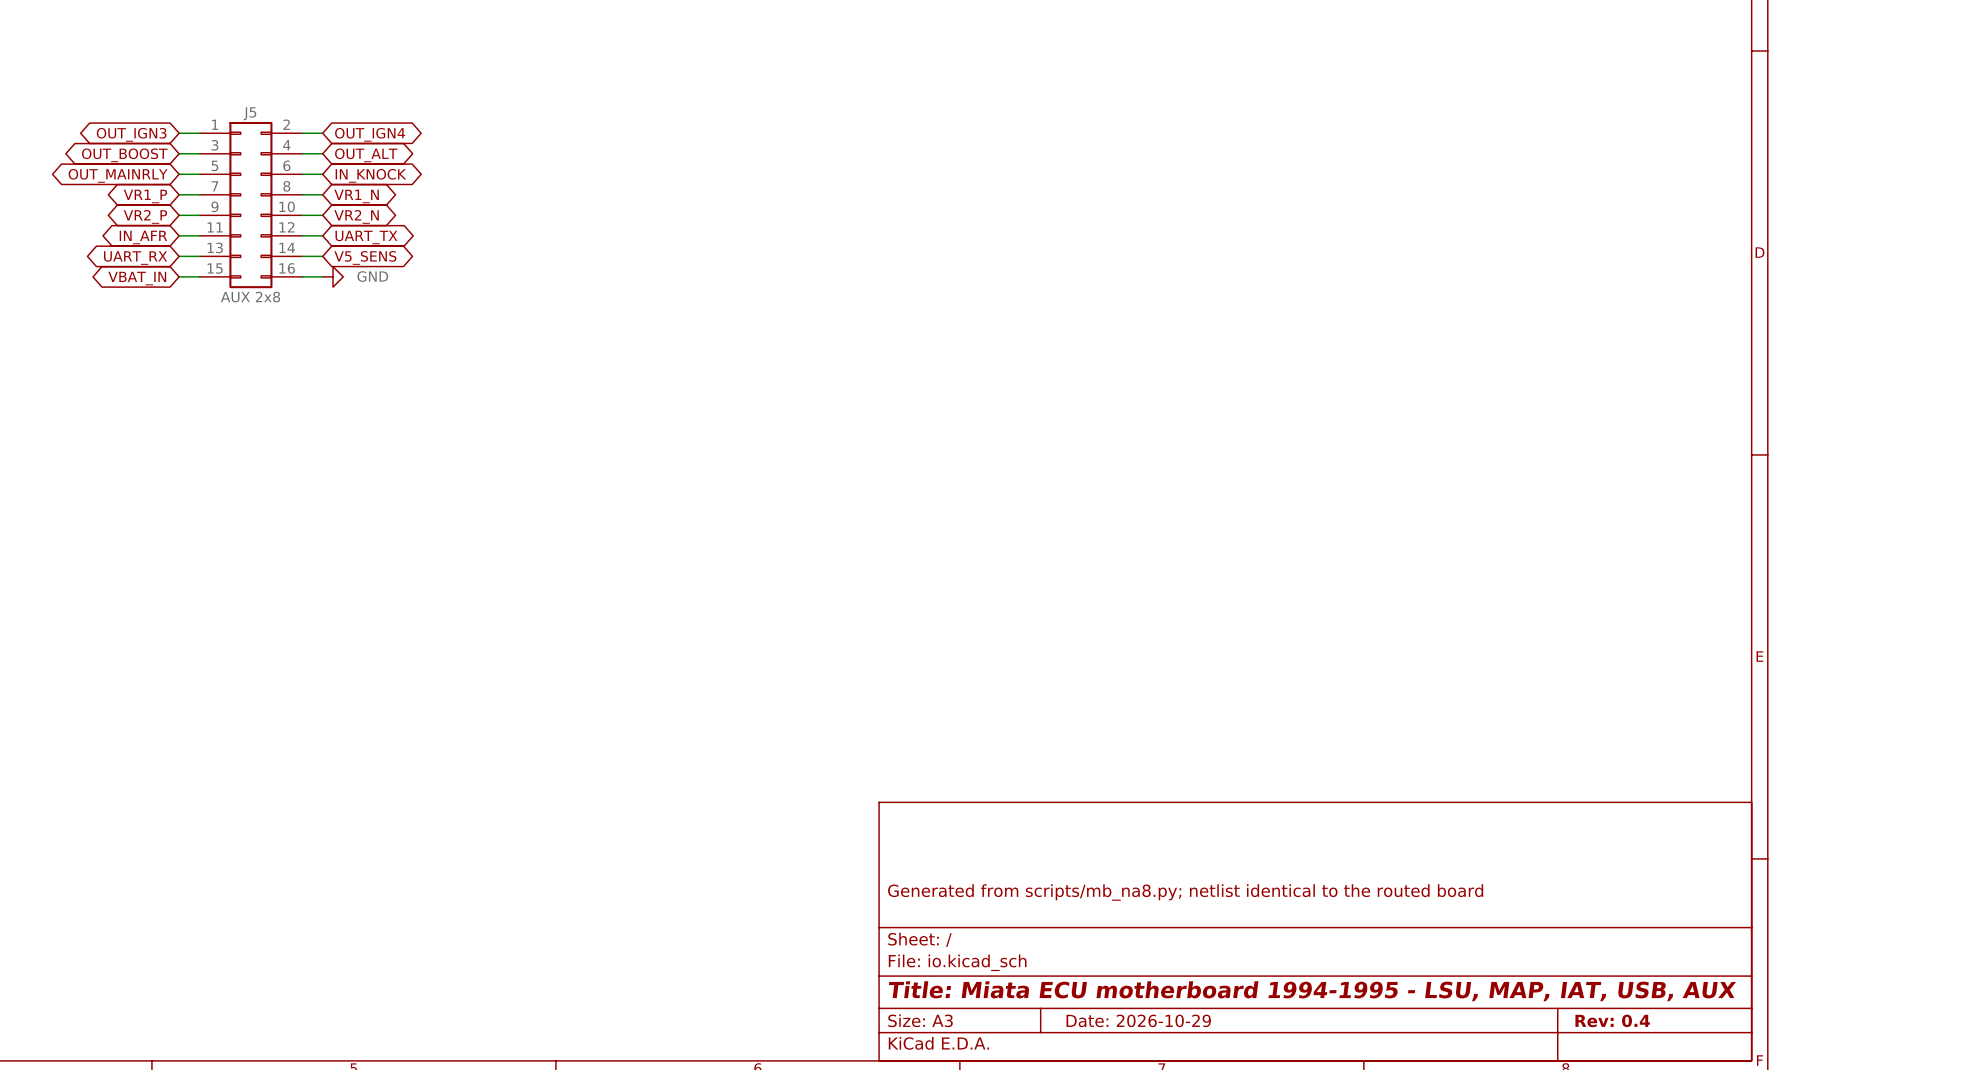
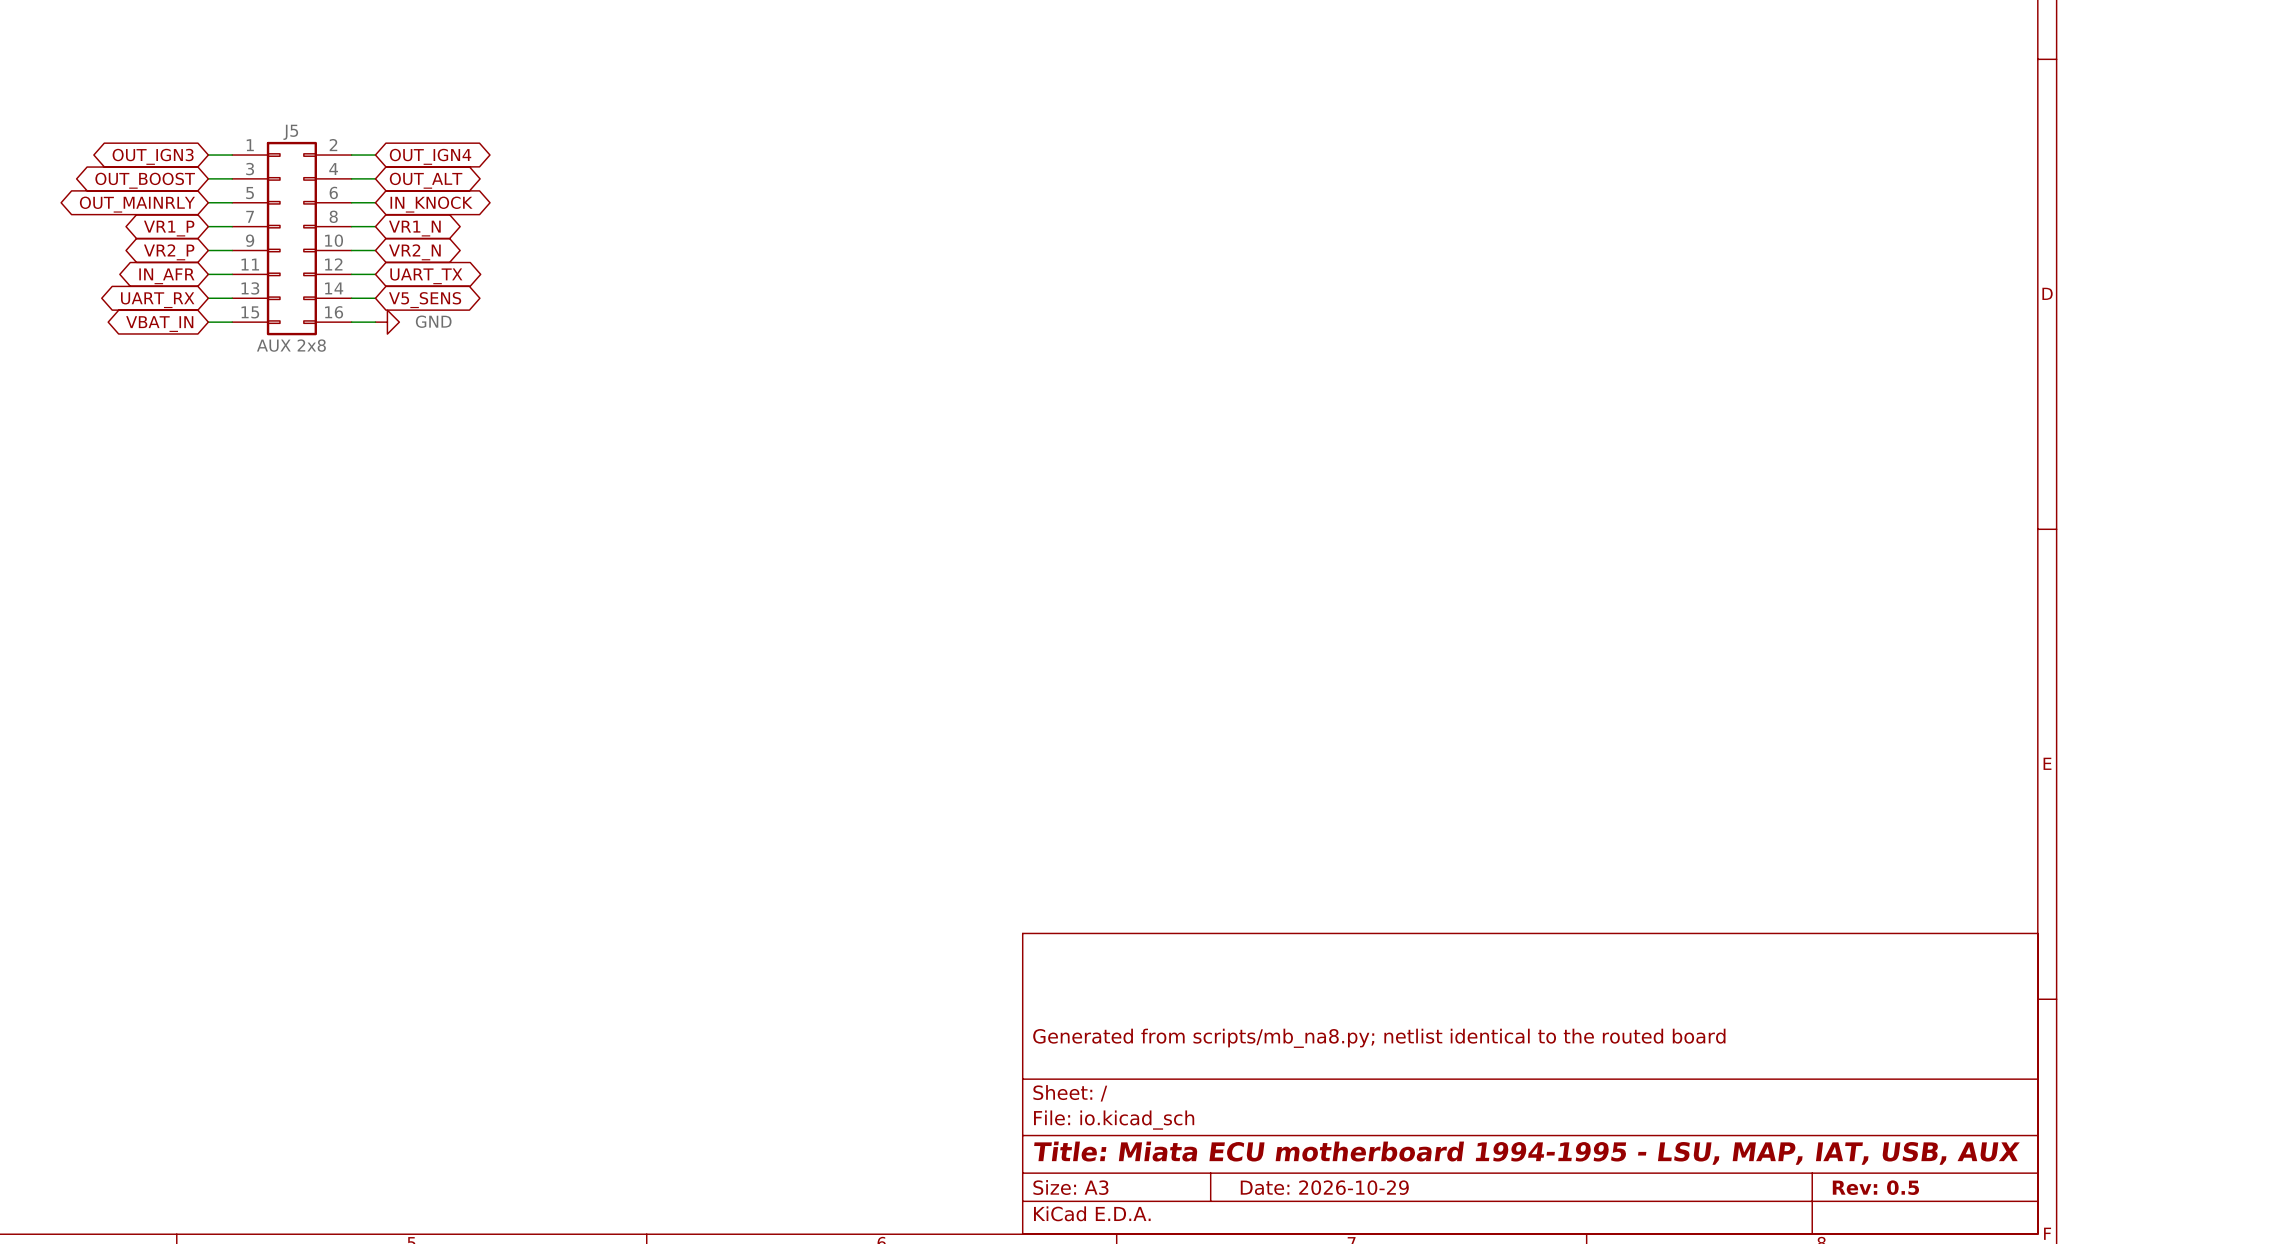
title block: Rev: 0.4 (1612, 1020) -> Rev: 0.5 (1875, 1187)

